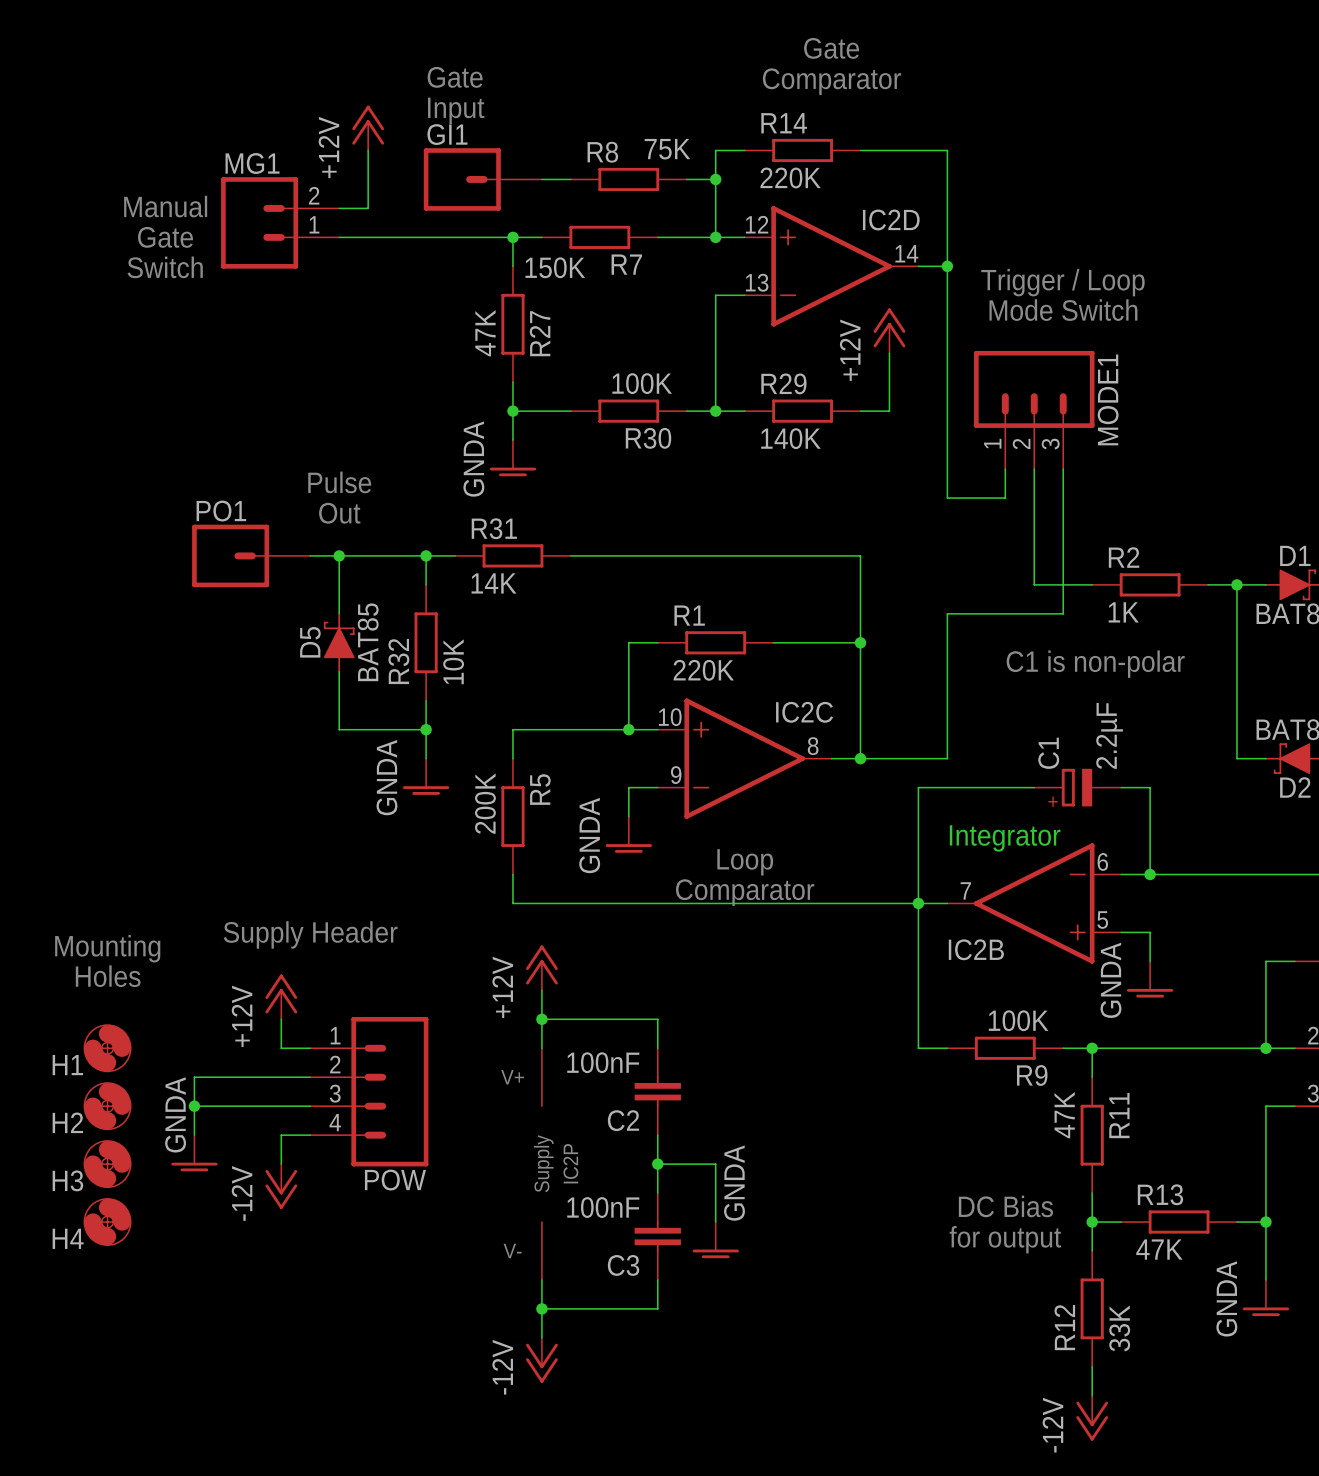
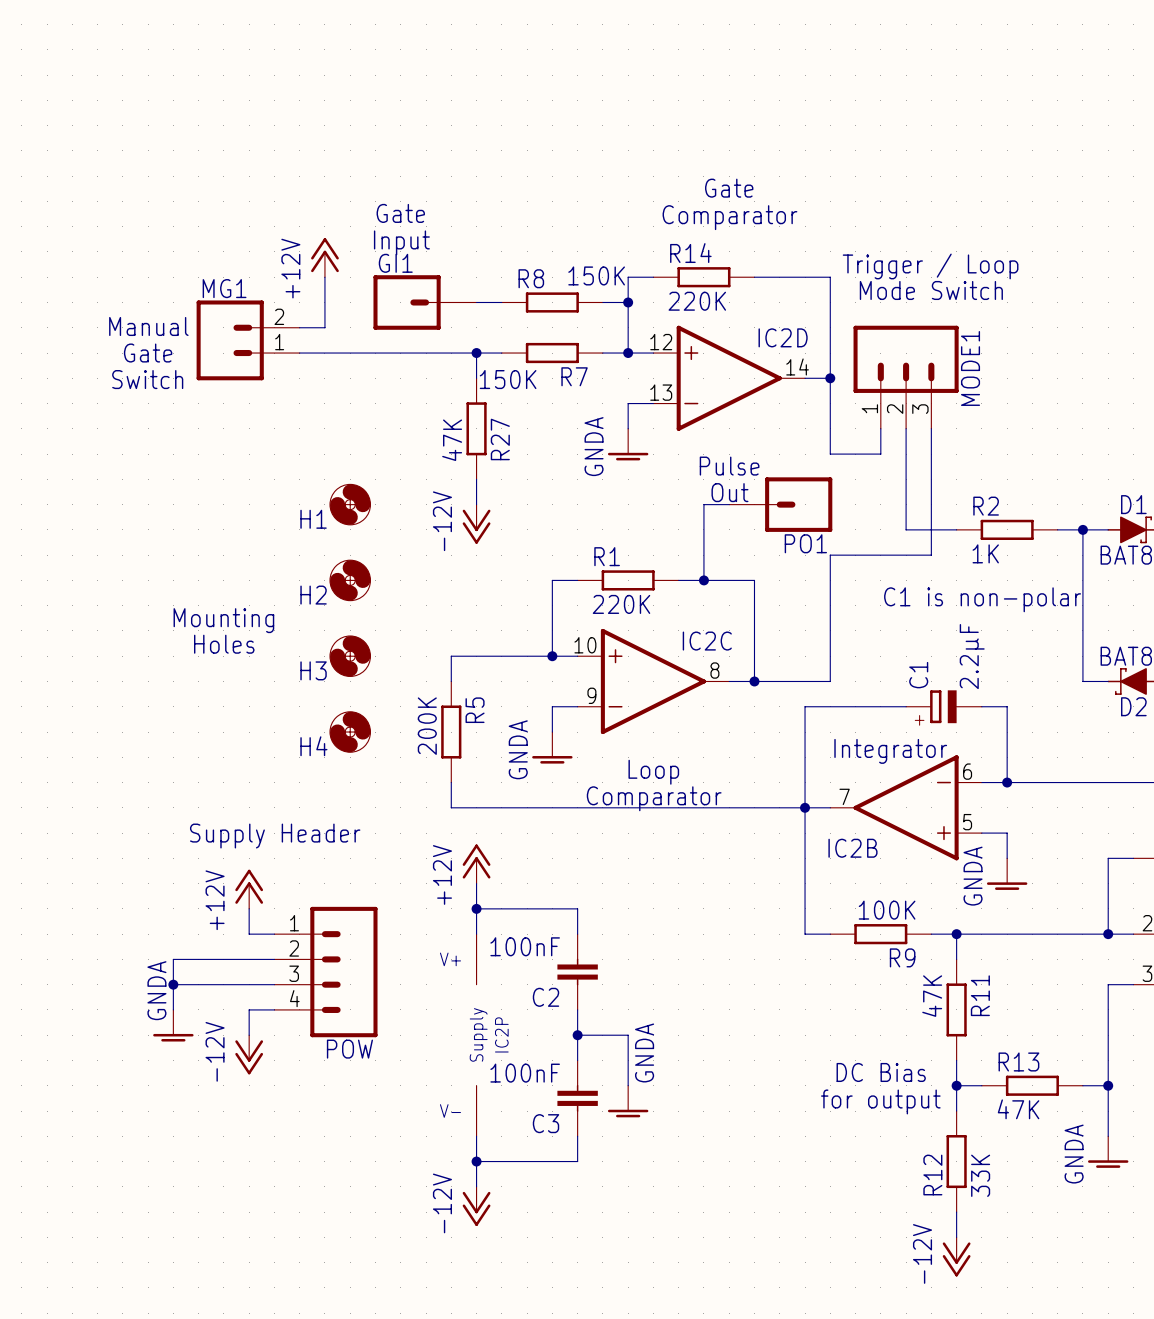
text position: Gate (831, 48) -> Gate (729, 188)
text position: Gate (455, 77) -> Gate (400, 213)
text position: Comparator (831, 81) -> Comparator (729, 217)
text position: Input (456, 110) -> Input (401, 242)
power symbol position: +12V (368, 128) -> +12V (324, 257)
R8 value: 75K (667, 149) -> 150K (596, 275)
wire: (368, 150) (368, 208) (339, 208) -> (324, 277) (324, 327) (299, 327)
wire: (744, 150) (715, 150) (715, 237) -> none
R14 position: (802, 150) -> (703, 277)
wire: (860, 150) (947, 150) (947, 295) -> (754, 277) (830, 277)
GI1 position: (482, 179) -> (425, 302)
wire: (541, 179) (570, 179) -> (476, 302) (501, 302)
R8 position: (628, 179) -> (552, 302)
wire: (686, 179) (715, 179) -> (602, 302) (628, 302)
junction: (715, 179) -> none
text position: Manual (165, 206) -> Manual (148, 326)
MG1 position: (280, 222) -> (248, 340)
text position: Gate (165, 237) -> Gate (148, 353)
wire: (339, 237) (541, 237) -> none
wire: (512, 237) (512, 266) -> (476, 353) (476, 378)
junction: (512, 237) -> none
R7 position: (599, 237) -> (552, 353)
wire: (657, 237) (744, 237) -> none
junction: (715, 237) -> none
IC2D position: (831, 266) -> (729, 378)
wire: (918, 266) (947, 266) -> (805, 378) (830, 378)
junction: (947, 266) -> none
text position: Switch (165, 267) -> Switch (147, 379)
R27 position: (512, 324) -> (476, 428)
junction: none -> (628, 302)
power symbol: +12V (889, 330) -> none
wire: (889, 353) (889, 411) (860, 411) -> none
wire: none -> (299, 353) (501, 353)
wire: (512, 382) (512, 440) -> none
wire: (715, 382) (715, 411) -> none
wire: (512, 411) (570, 411) -> none
junction position: (512, 411) -> (476, 353)
R30: 100K (628, 411) -> none
wire: (686, 411) (744, 411) -> (602, 353) (653, 353)
junction position: (715, 411) -> (628, 353)
R29: 140K (802, 411) -> none
junction: none -> (830, 378)
wire: none -> (653, 403) (628, 403) (628, 428)
power symbol: GNDA (512, 458) -> none
text: Pulse (339, 482) -> none
power symbol: none -> GNDA (628, 444)
text: none -> Pulse (729, 466)
text: Out (339, 513) -> none
text: none -> Out (729, 492)
PO1 rotation: 0° (230, 555) -> 180° (798, 504)
PO1 position: (251, 555) -> (780, 504)
wire: (310, 555) (455, 555) -> none
wire: (339, 555) (339, 613) -> none
junction: (339, 555) -> none
wire: (426, 555) (426, 584) -> (476, 479) (476, 504)
junction: (426, 555) -> none
R31: 14K (512, 555) -> none
wire: (570, 555) (802, 555) -> (703, 580) (703, 504)
wire: (831, 555) (860, 555) (860, 642) -> none
power symbol: none -> -12V (476, 524)
D5: BAT85 (339, 642) -> none
R32: 10K (426, 642) -> none
junction position: (860, 642) -> (703, 580)
wire: (339, 671) (339, 729) (426, 729) -> none
text: none -> Mounting (223, 620)
wire: (426, 700) (426, 758) -> none
text: none -> Holes (224, 644)
junction: (426, 729) -> none
power symbol: GNDA (426, 776) -> none
text: Mounting (107, 948) -> none
text: Holes (108, 976) -> none
H1 position: (107, 1048) -> (350, 504)
H2 position: (107, 1106) -> (350, 580)
H3 position: (107, 1164) -> (350, 656)
H4 position: (107, 1222) -> (350, 732)

